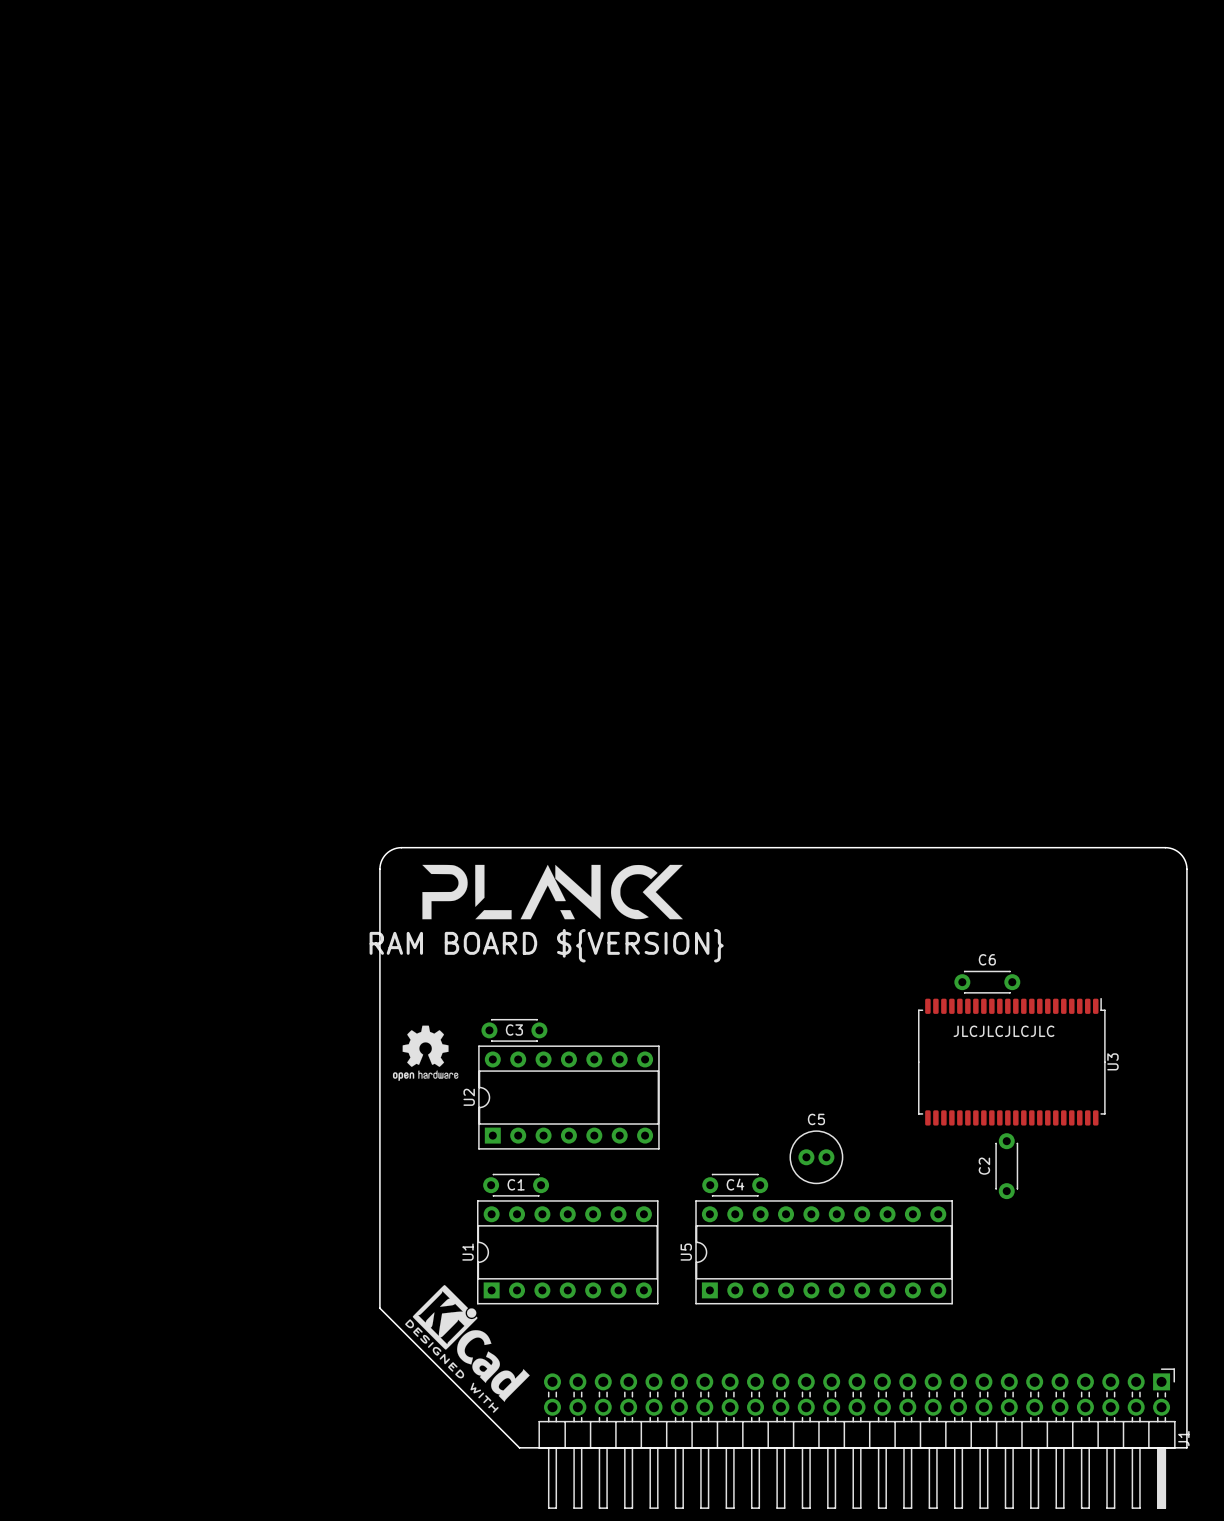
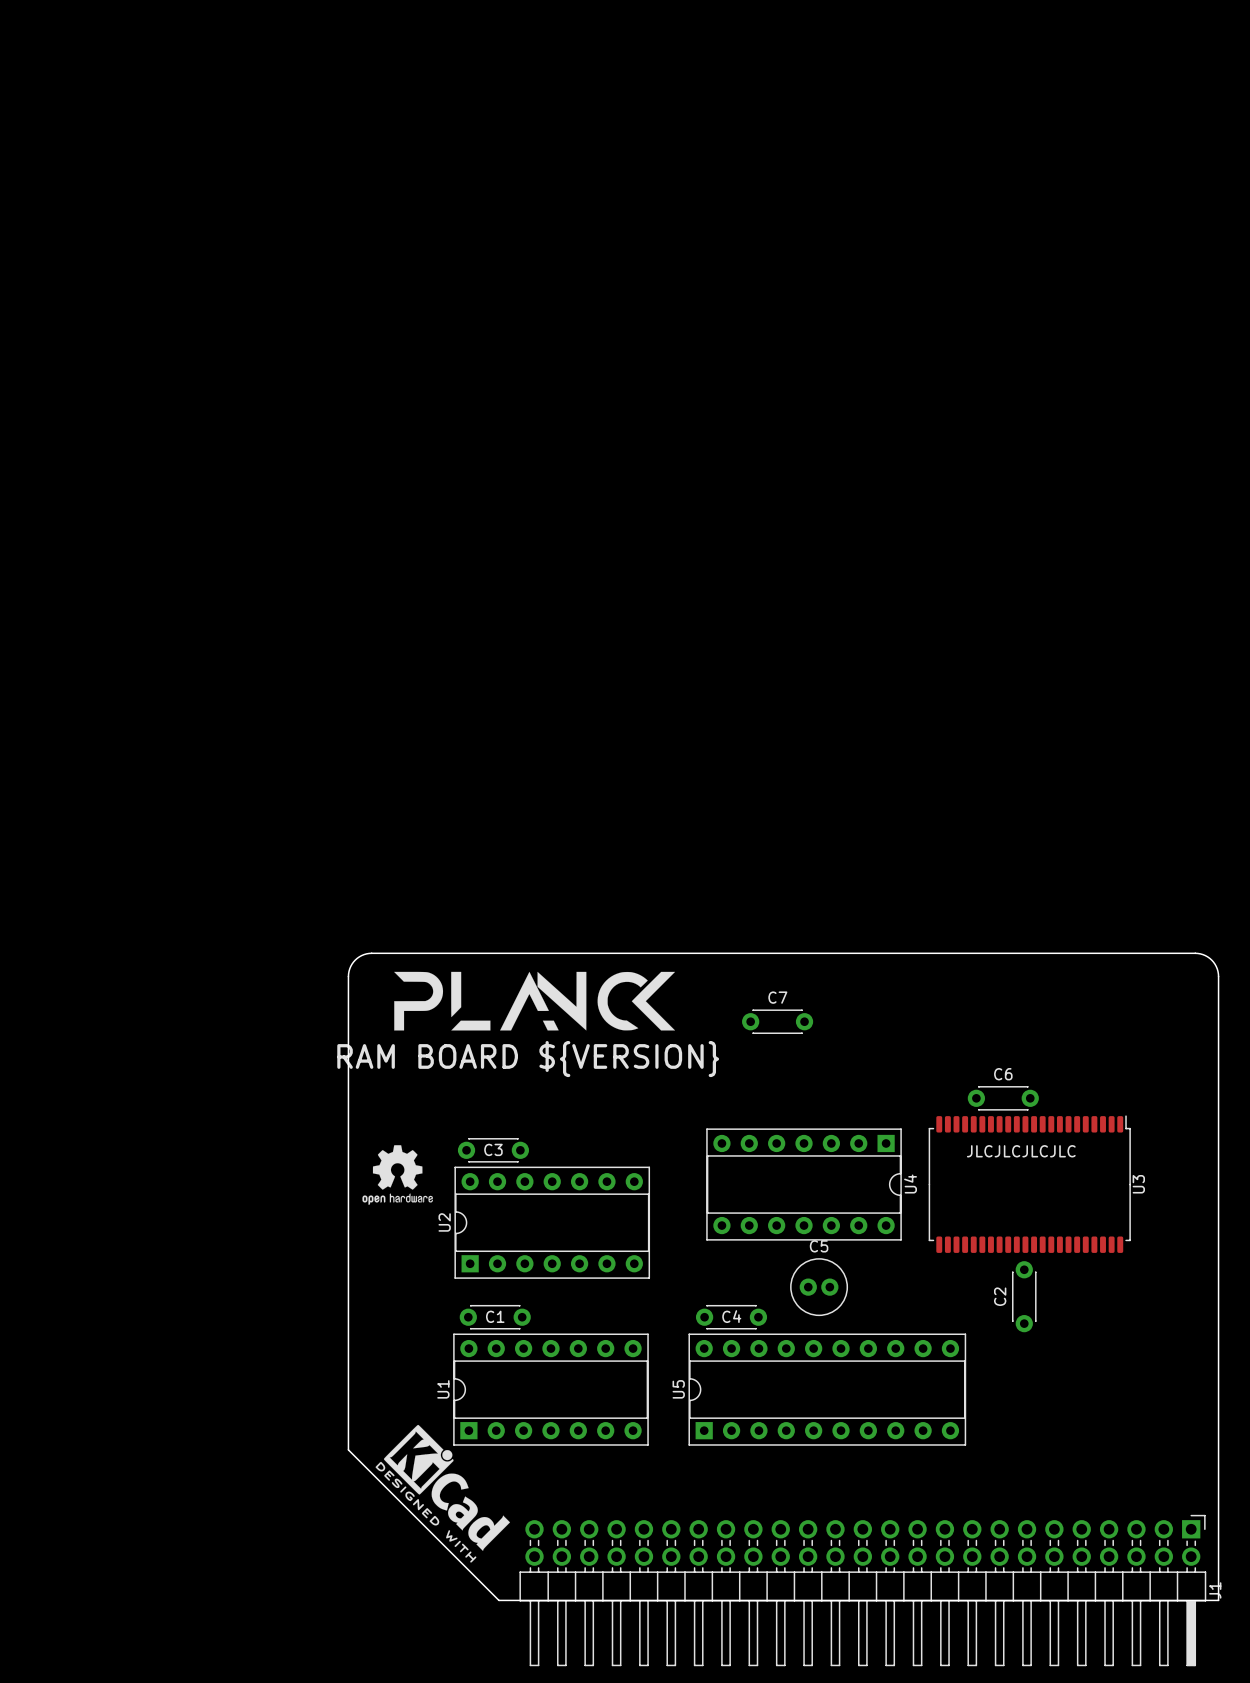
C7: none -> (777, 1021)
U4: none -> (804, 1184)

